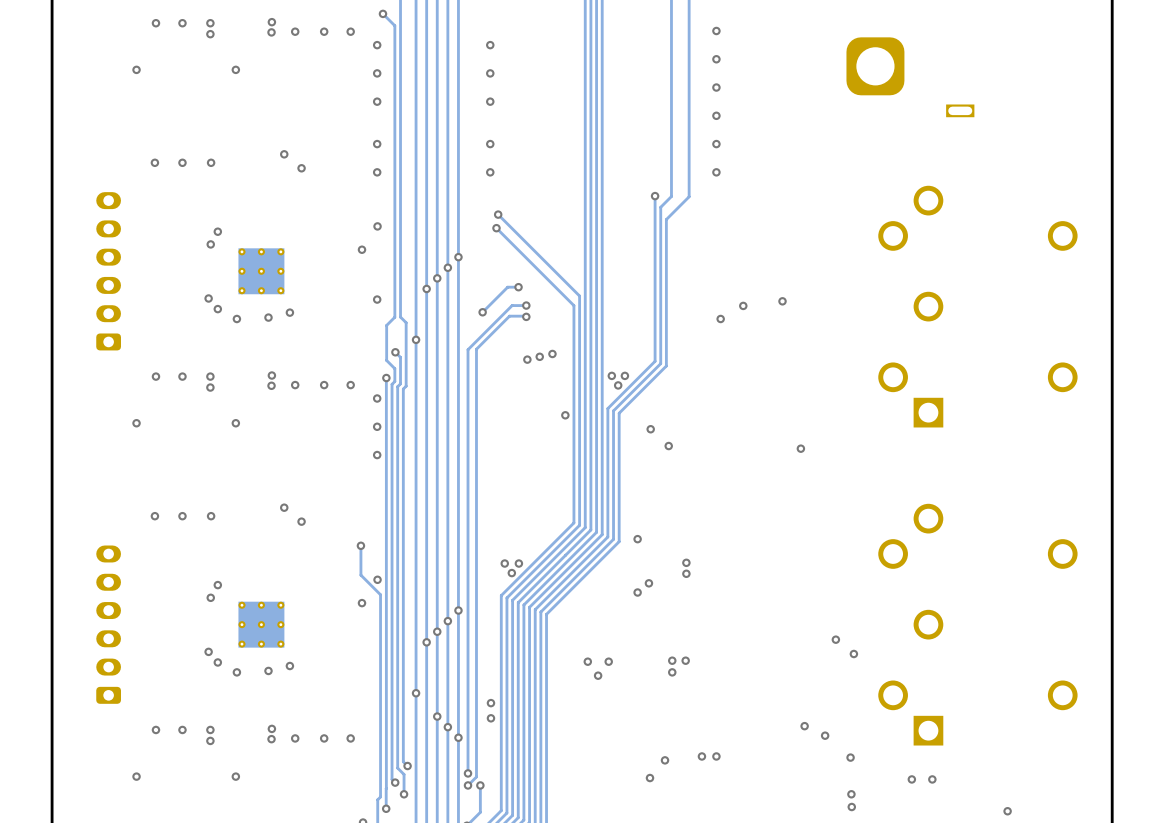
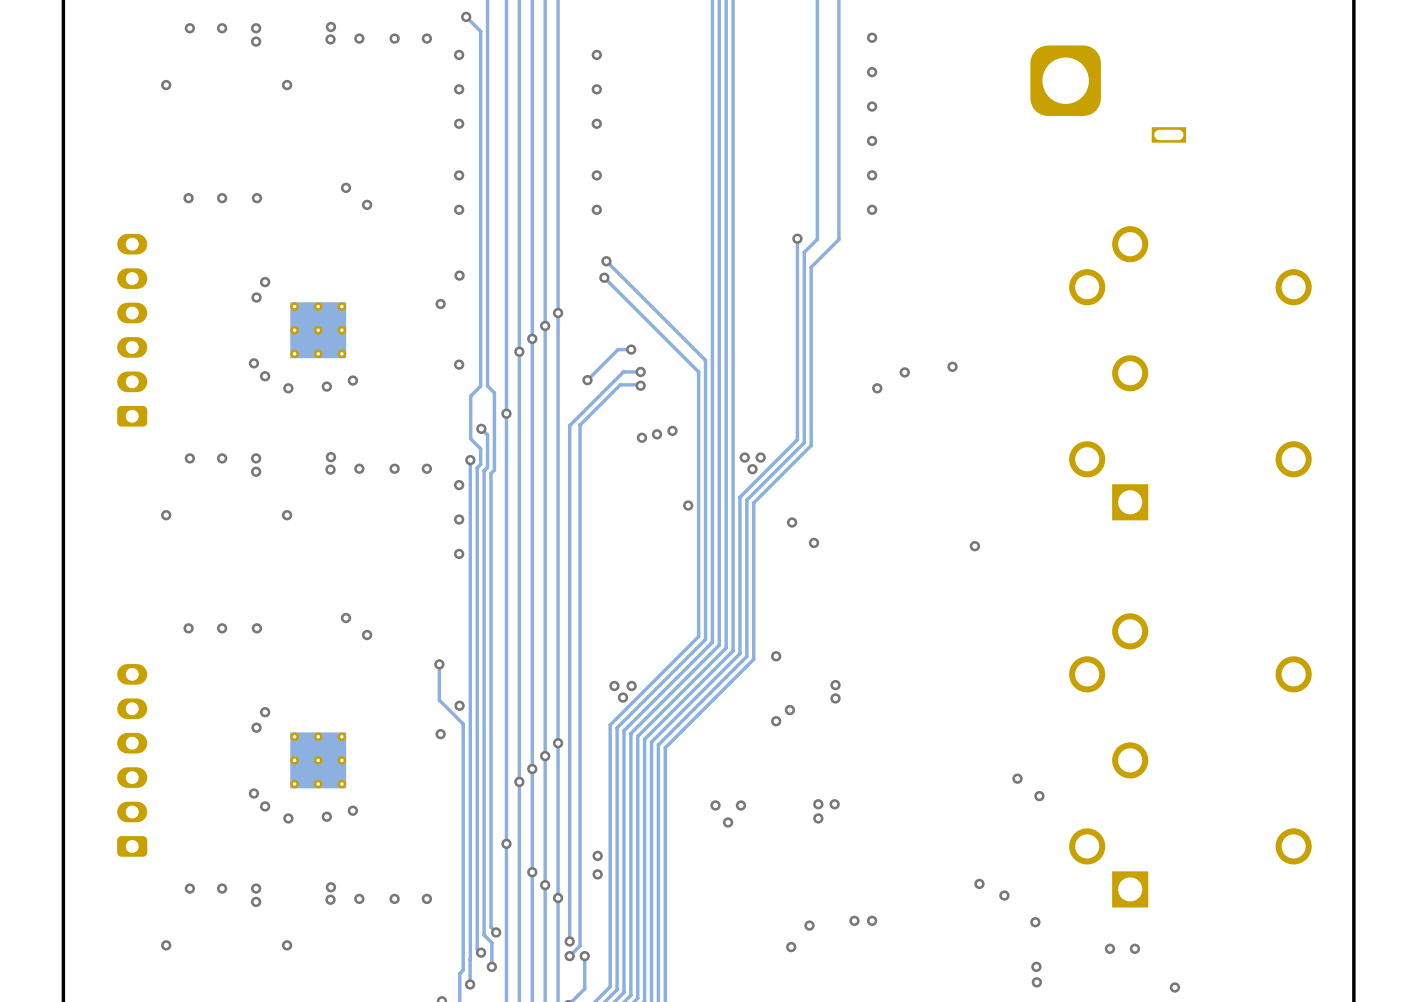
via position: (1007, 811) -> (1174, 987)

